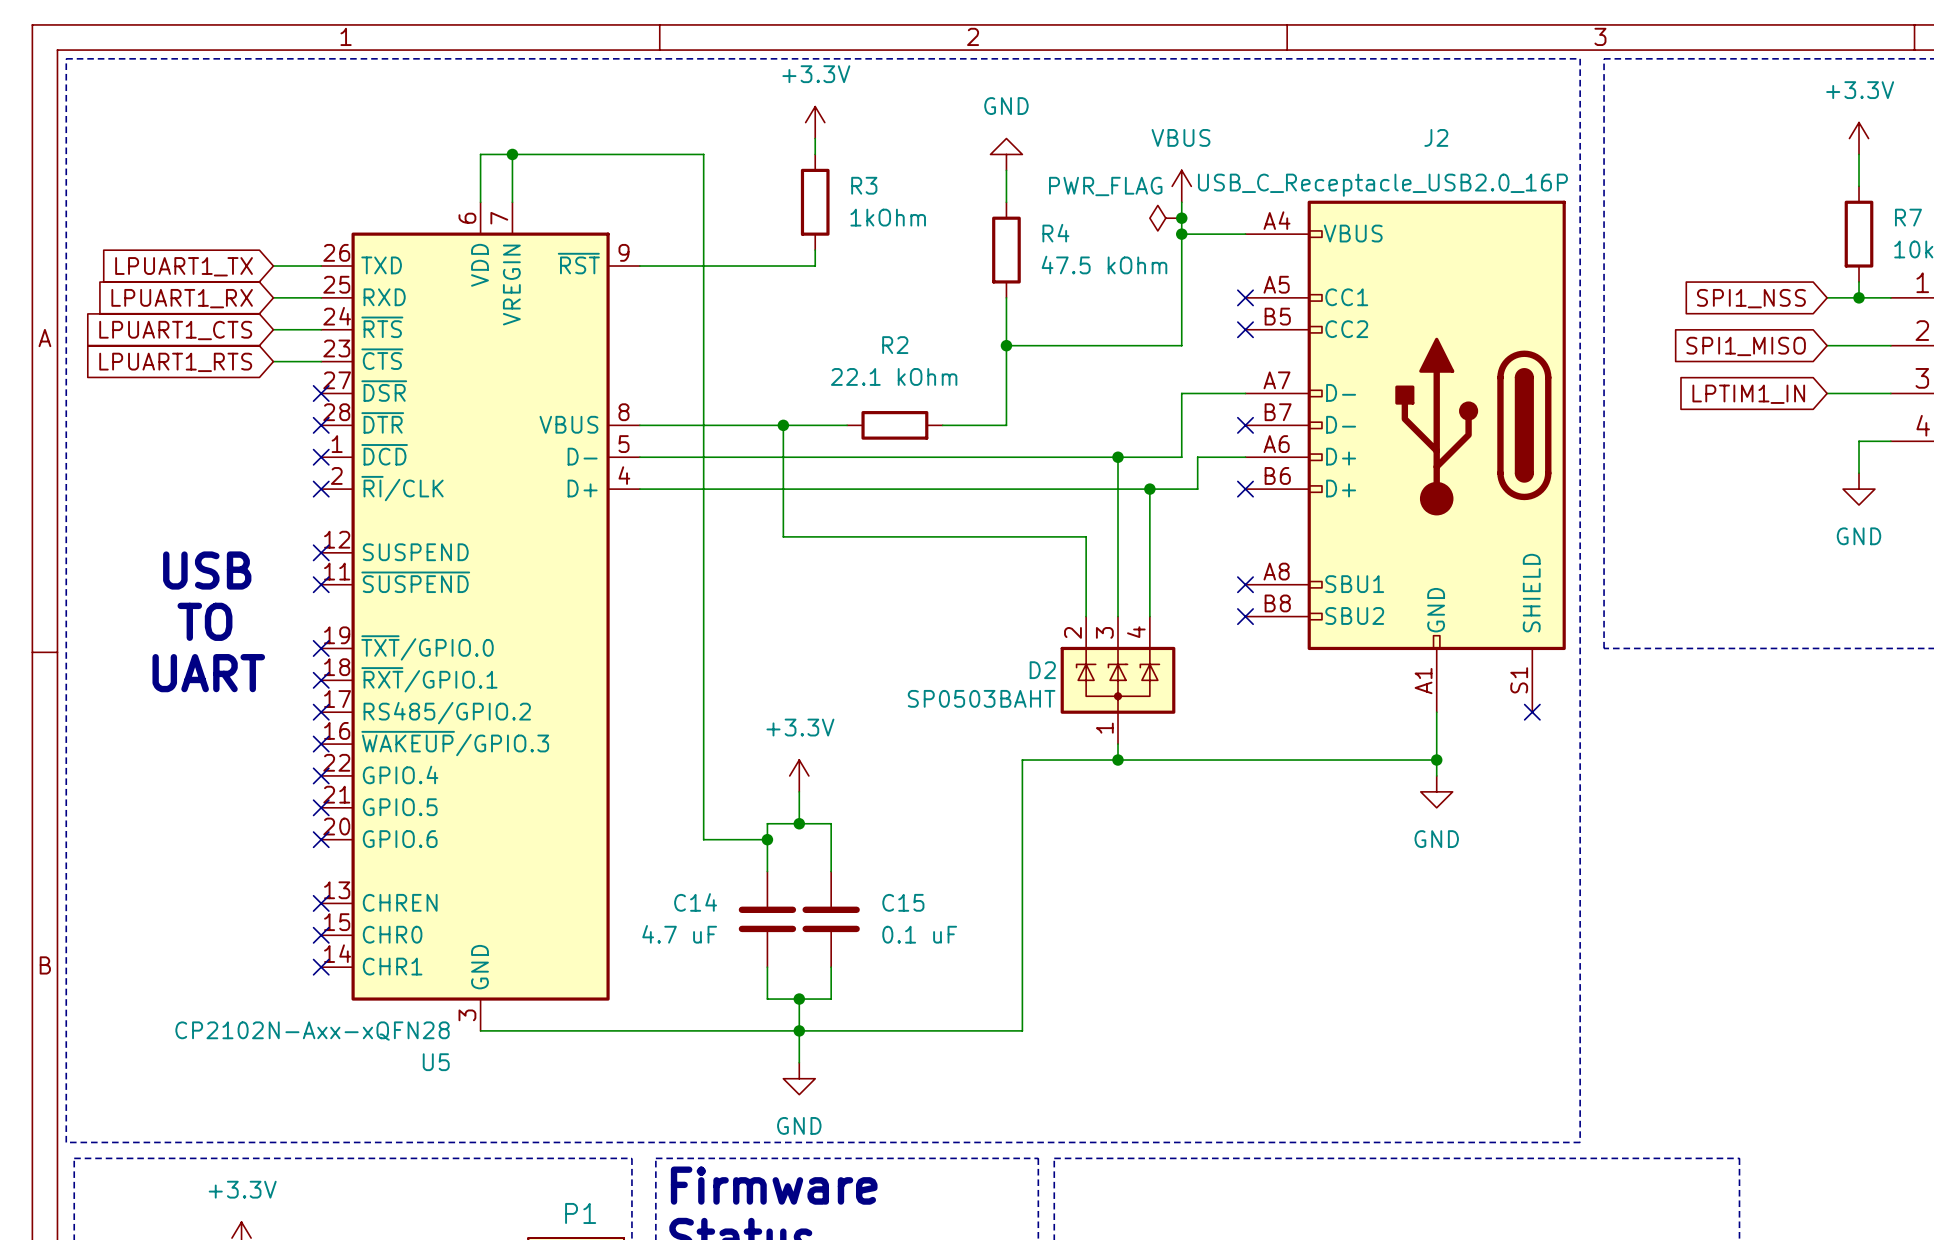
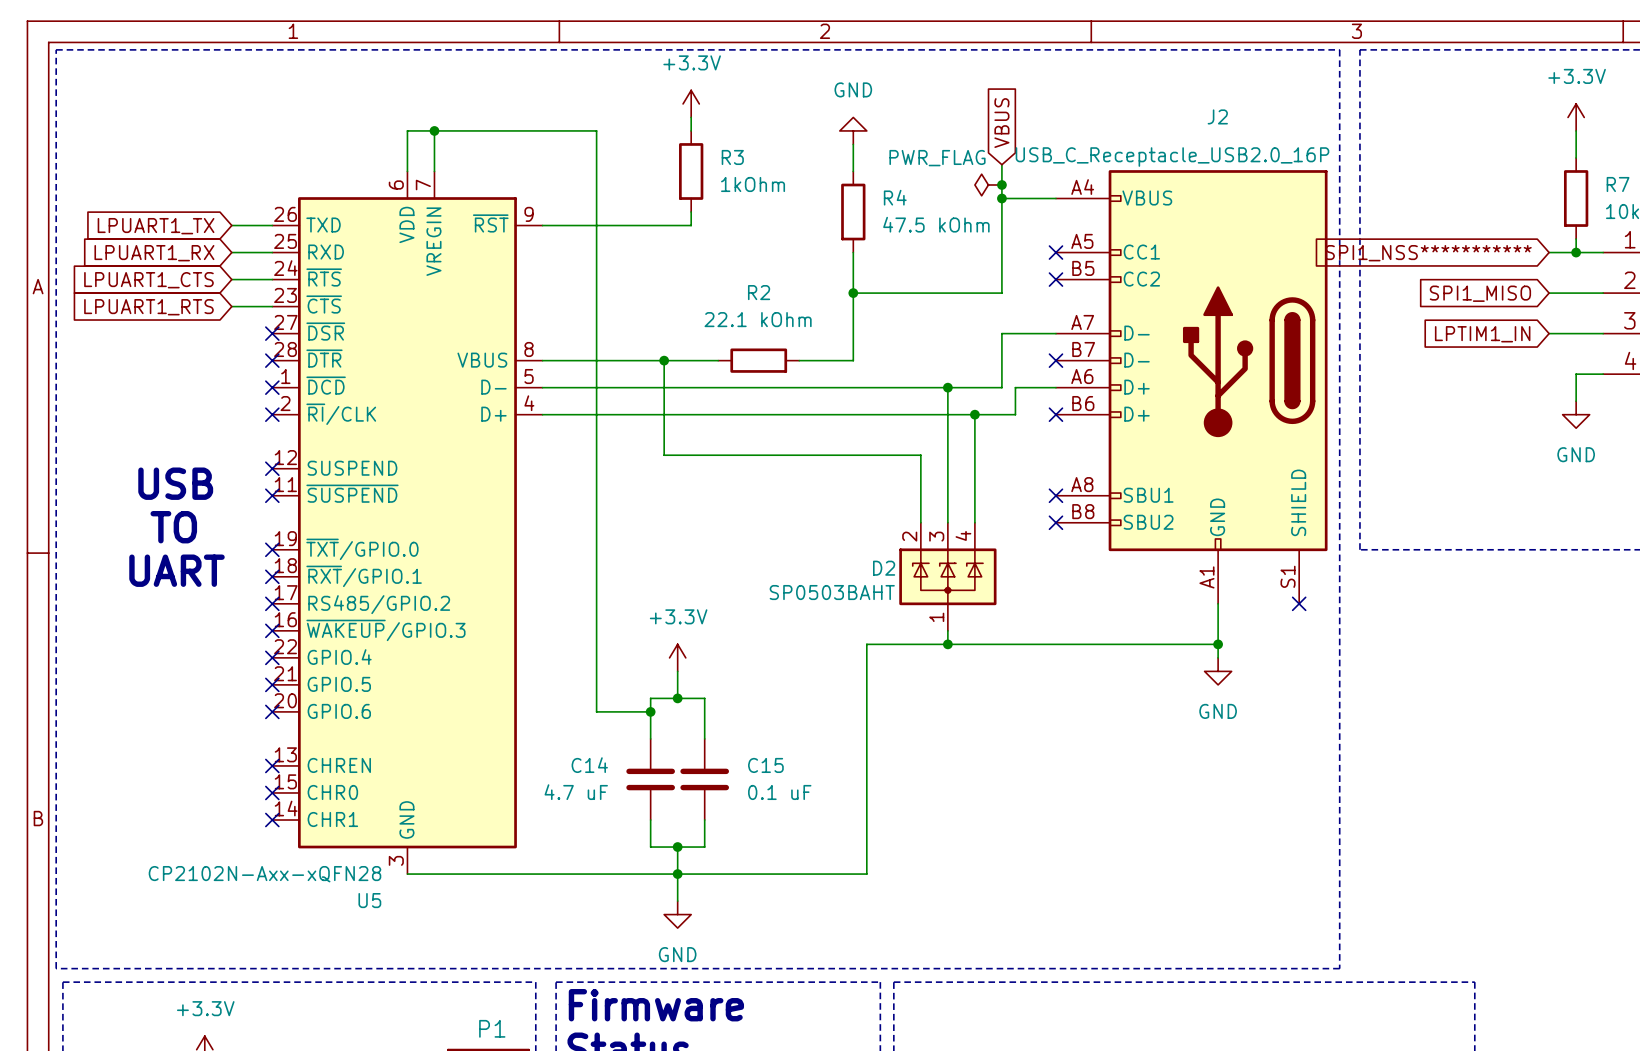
global label: none -> VBUS (1001, 123)
power symbol: VBUS (1181, 186) -> none
global label: SPI1_NSS (1751, 298) -> SPI1_NSS*********** (1428, 253)

